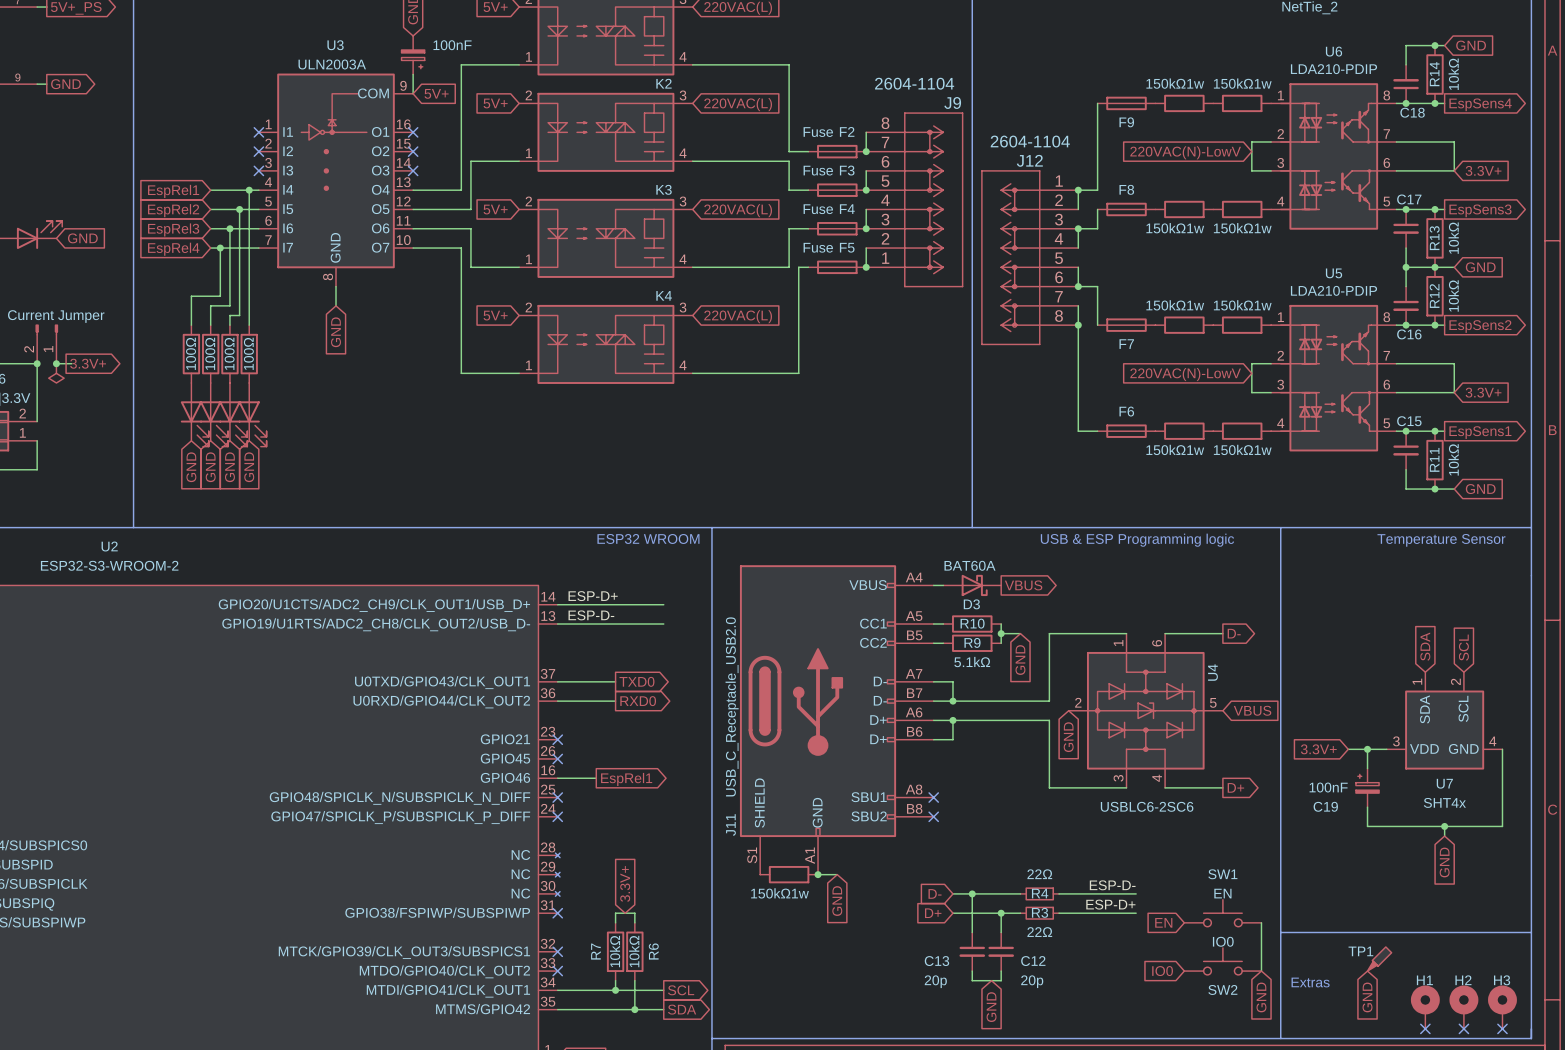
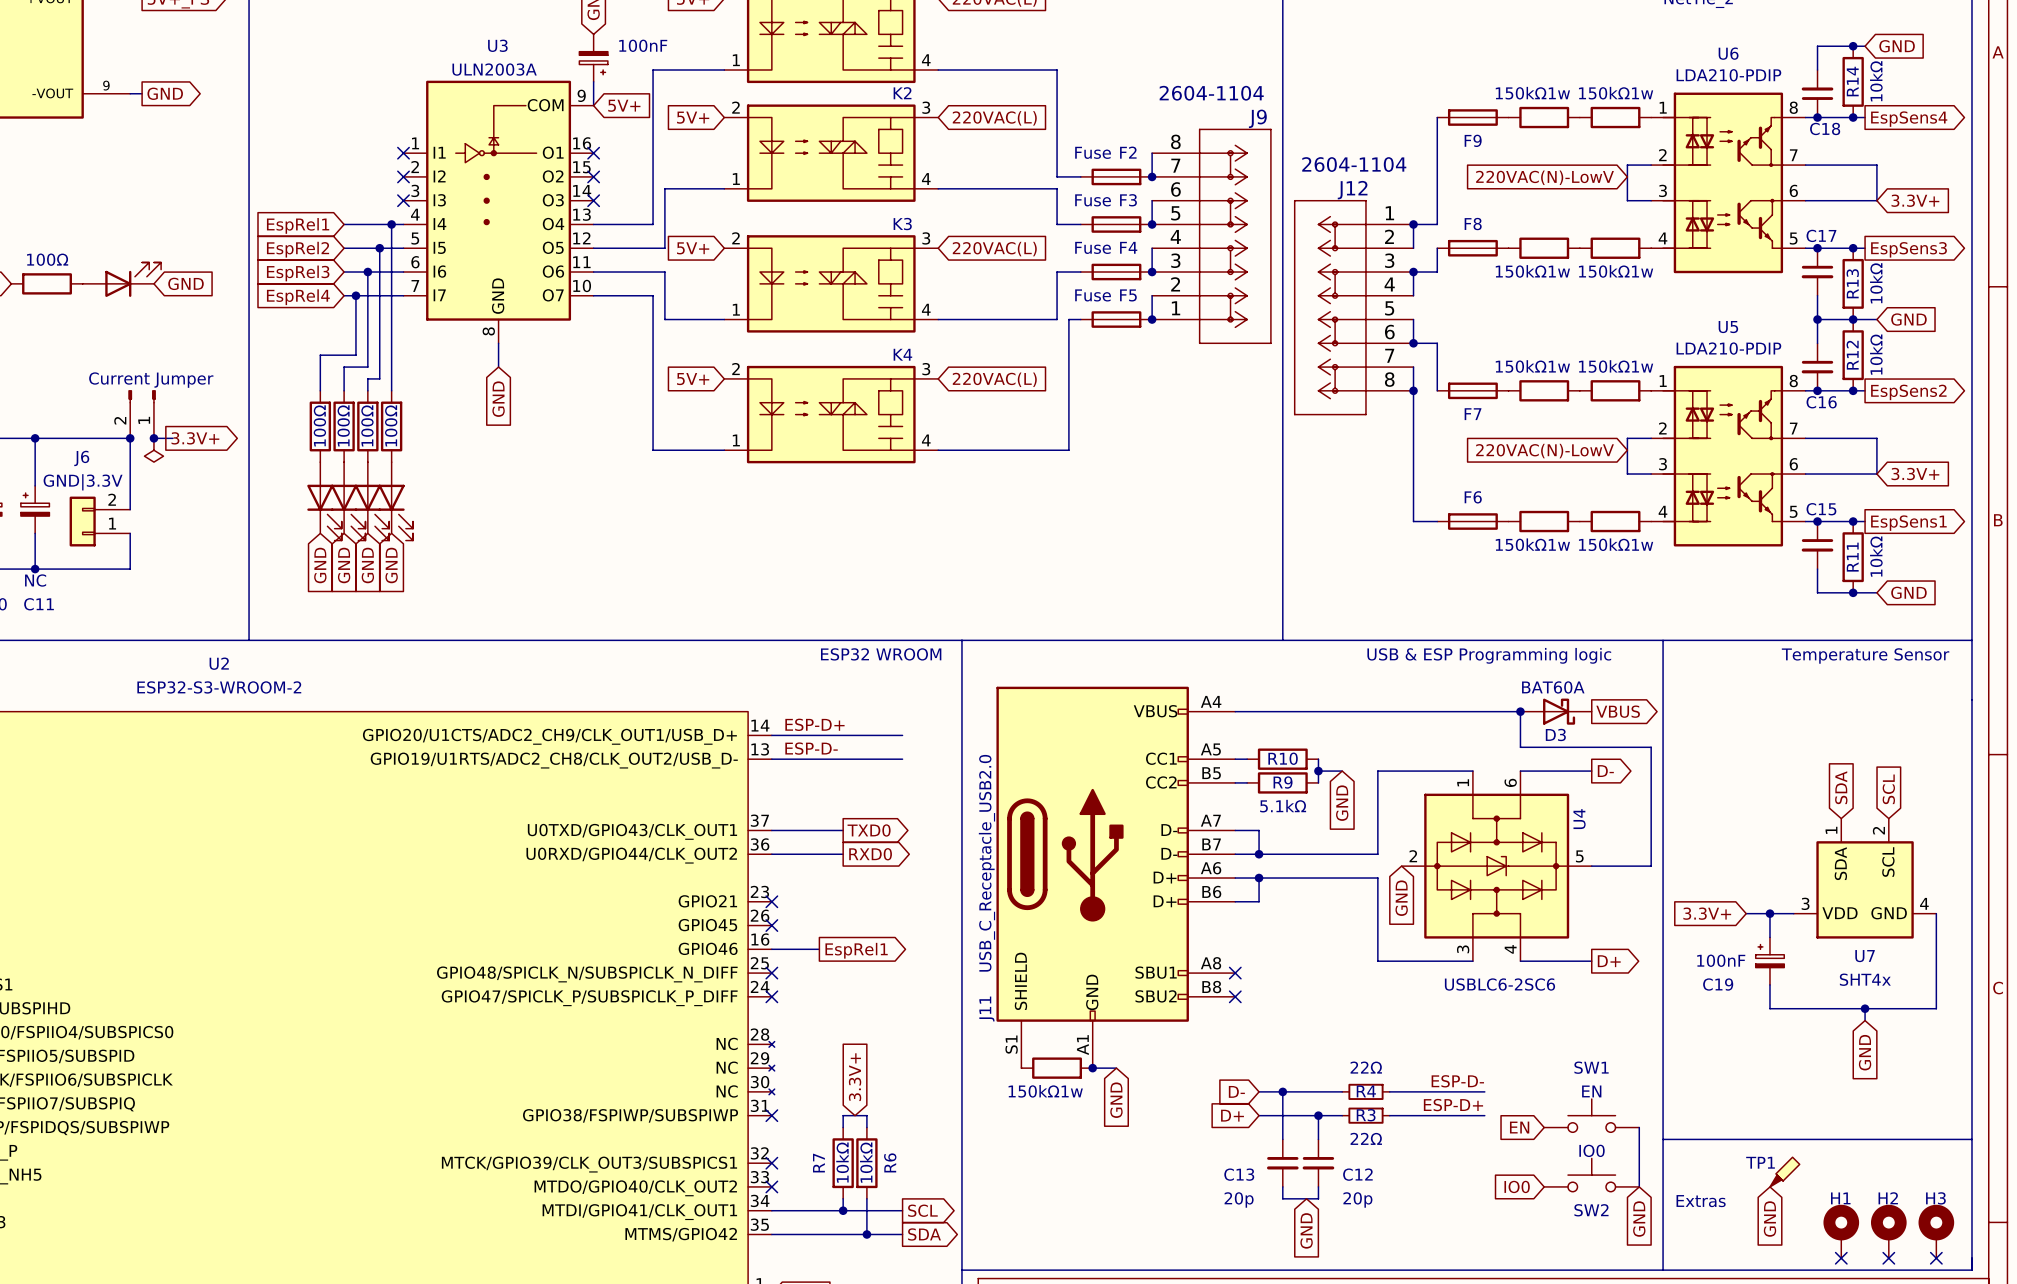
wire: none -> (1247, 711) (1520, 711) (1520, 747) (1651, 747) (1651, 866) (1591, 866)
D3 position: (972, 585) -> (1556, 711)
global label: VBUS (1023, 585) -> none
junction: none -> (1520, 711)
global label: none -> VBUS (1618, 711)
global label: VBUS (1252, 710) -> none

